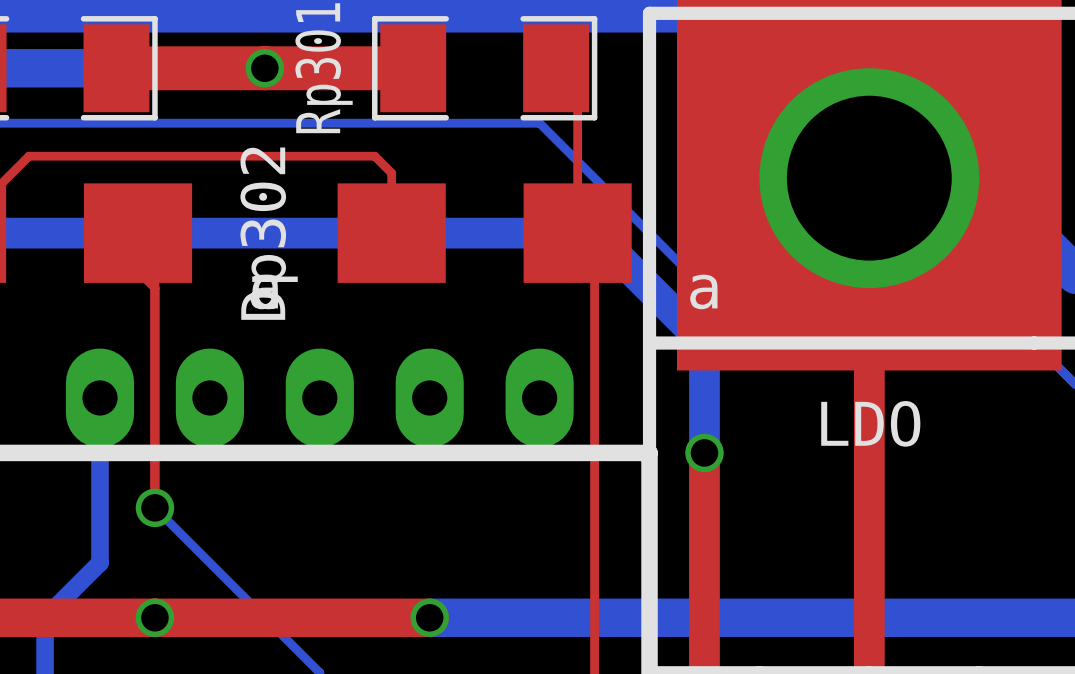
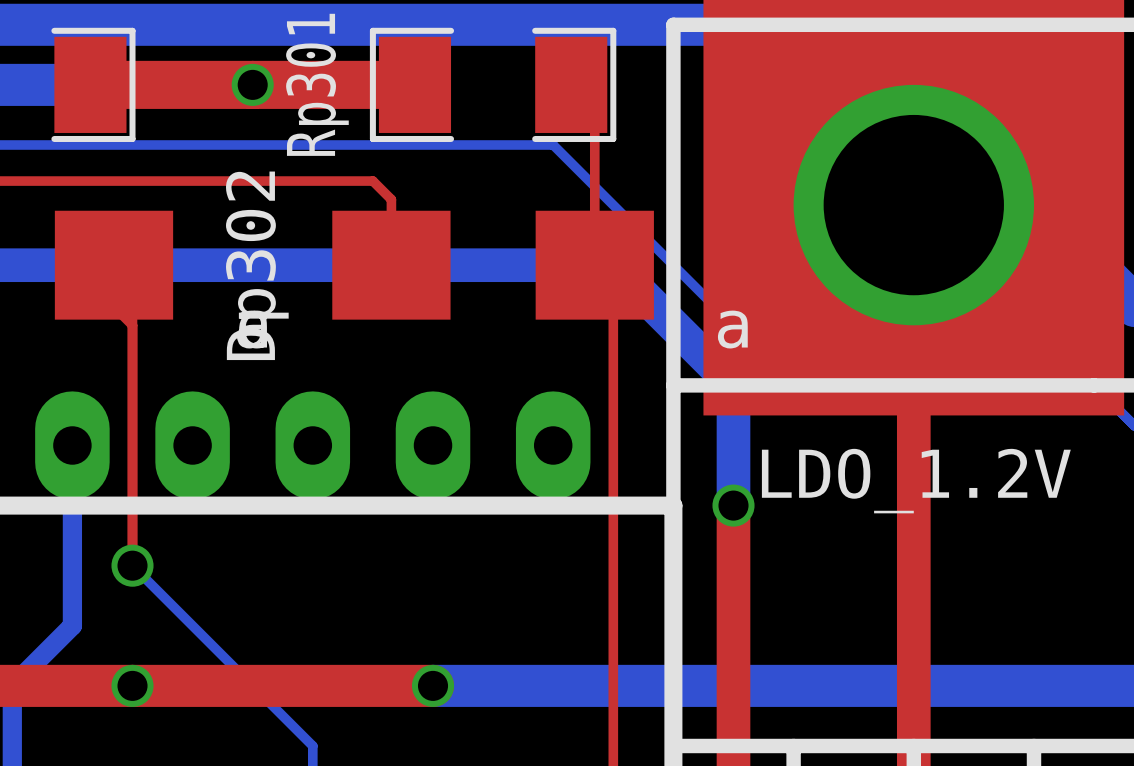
part value: LDO (870, 423) -> LDO_1.2V (916, 481)

